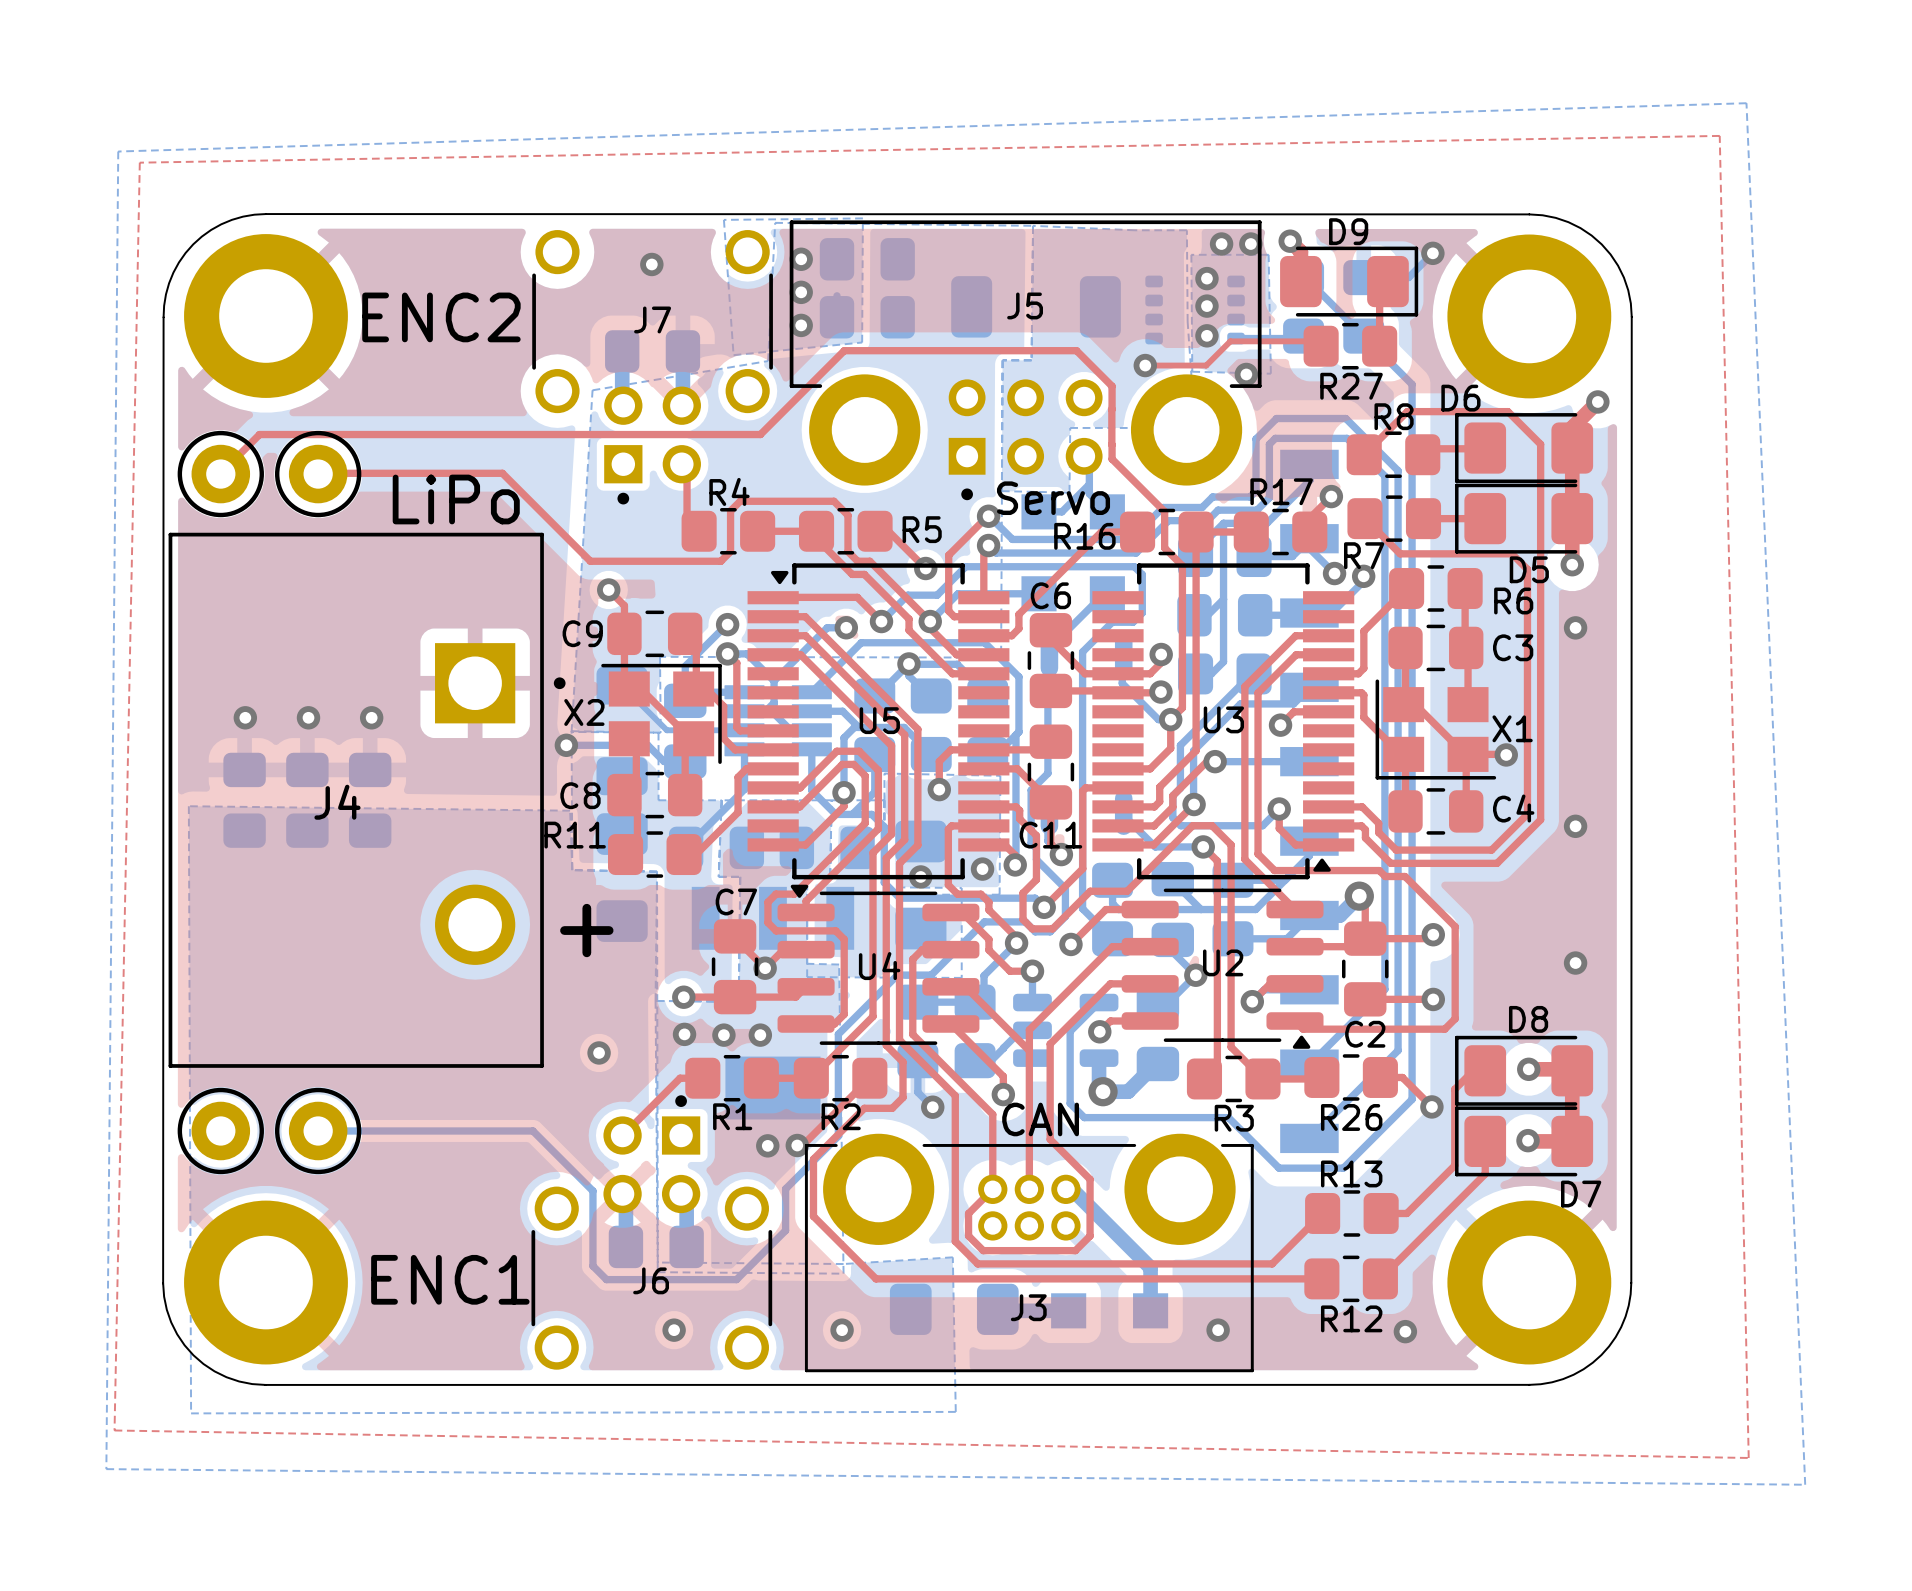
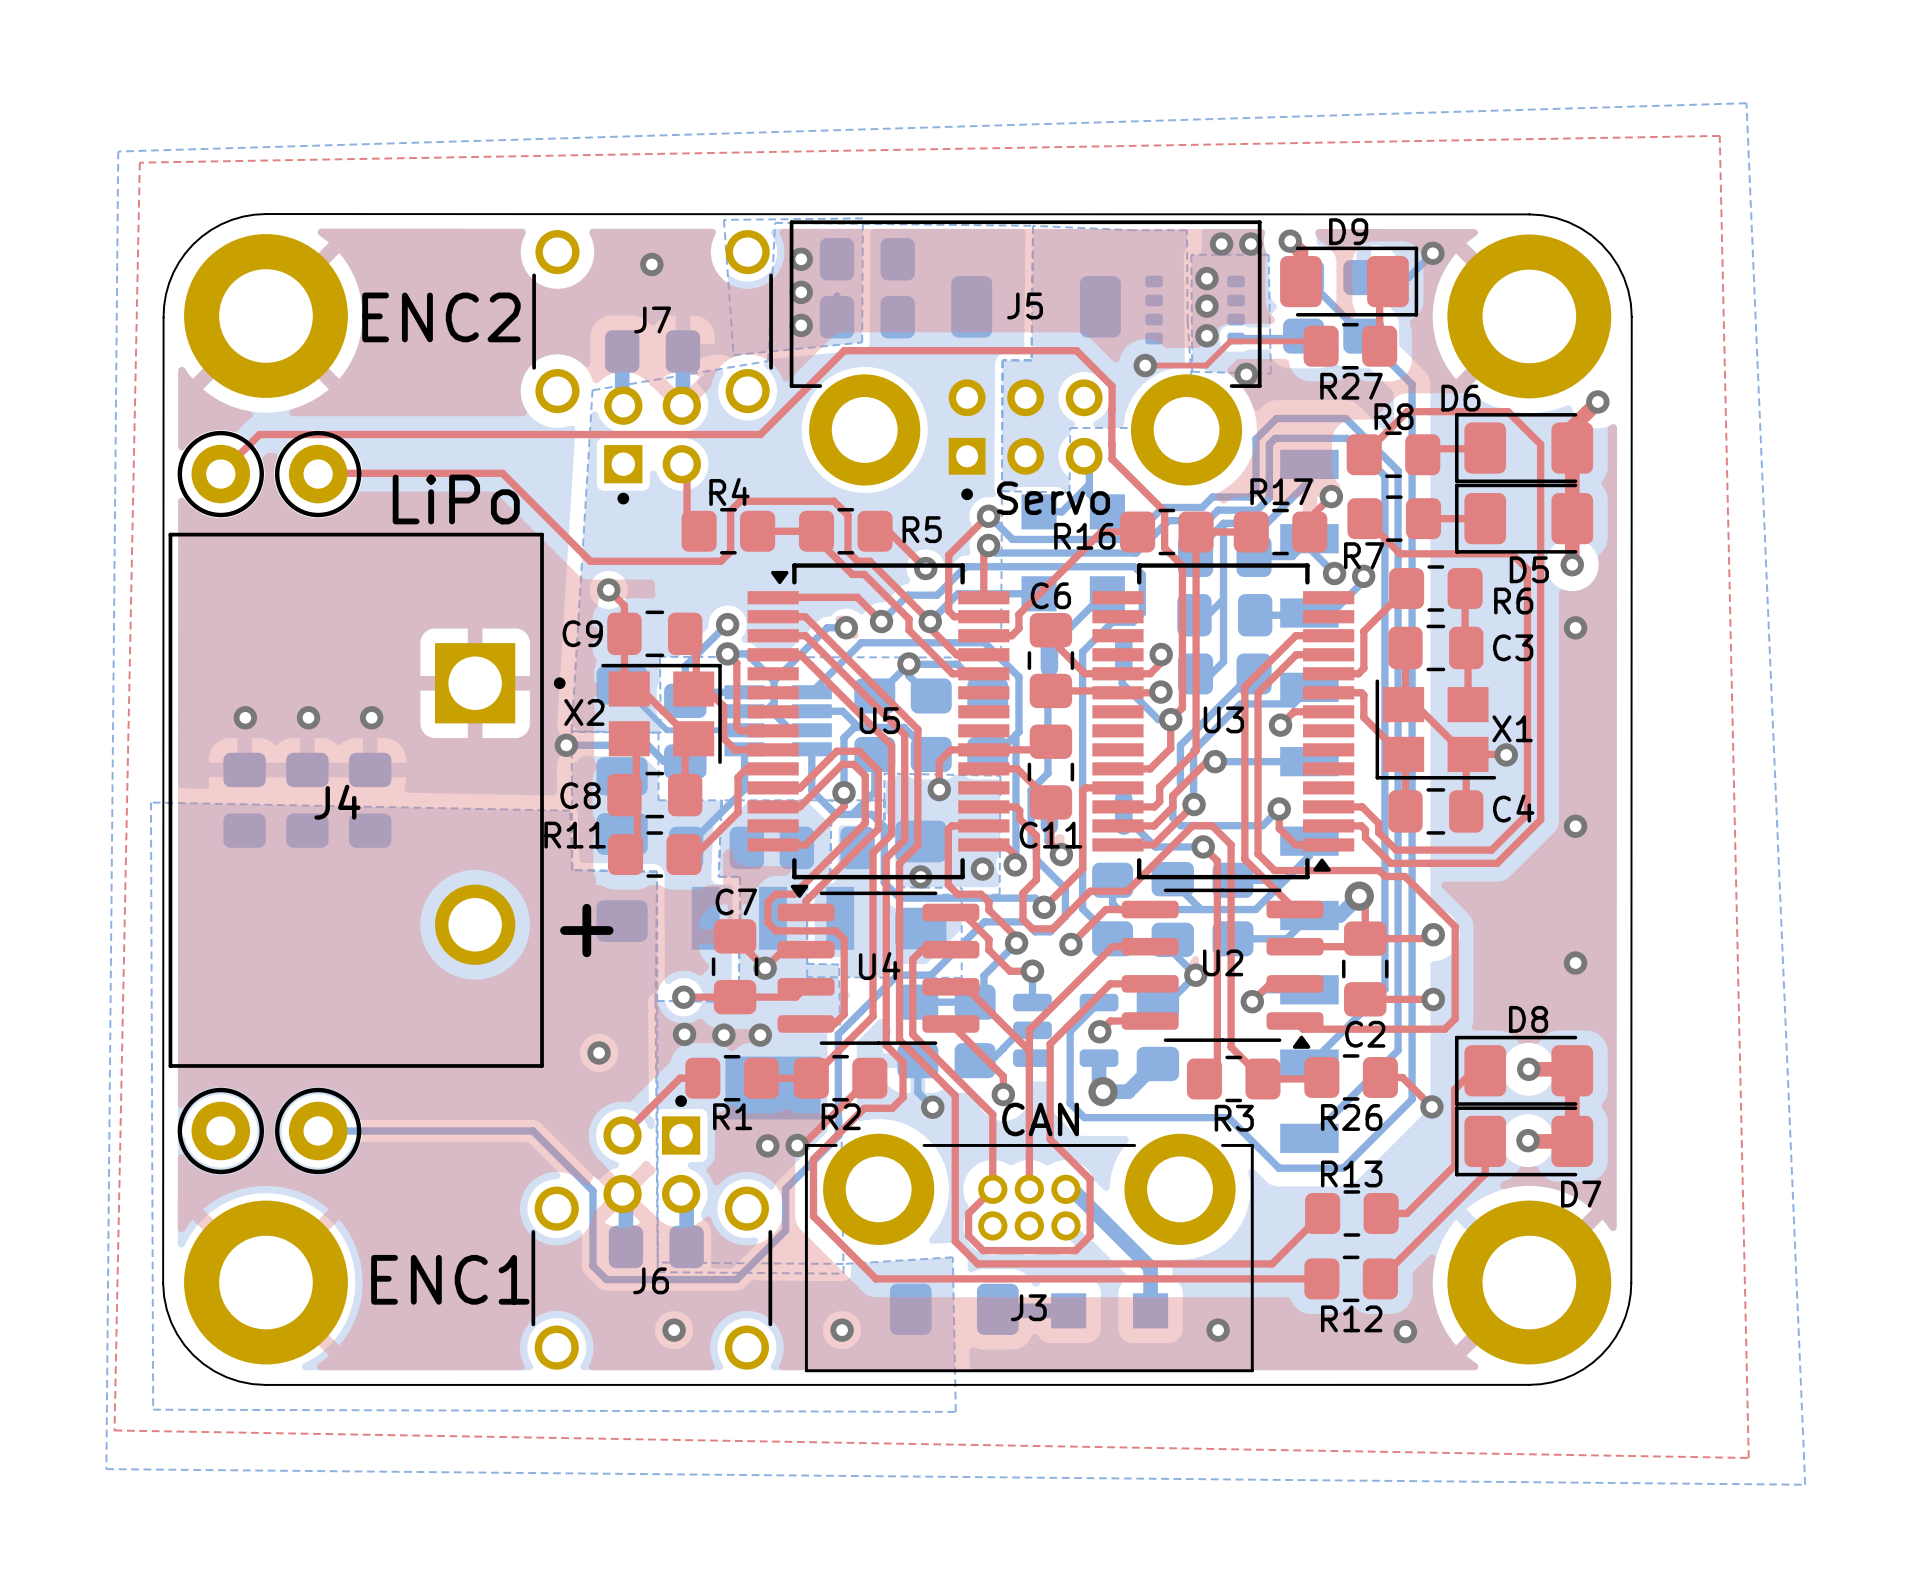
bottom zone outline: (570, 810) (188, 806) (191, 1413) (955, 1411) -> (570, 810) (150, 802) (153, 1409) (955, 1411)

